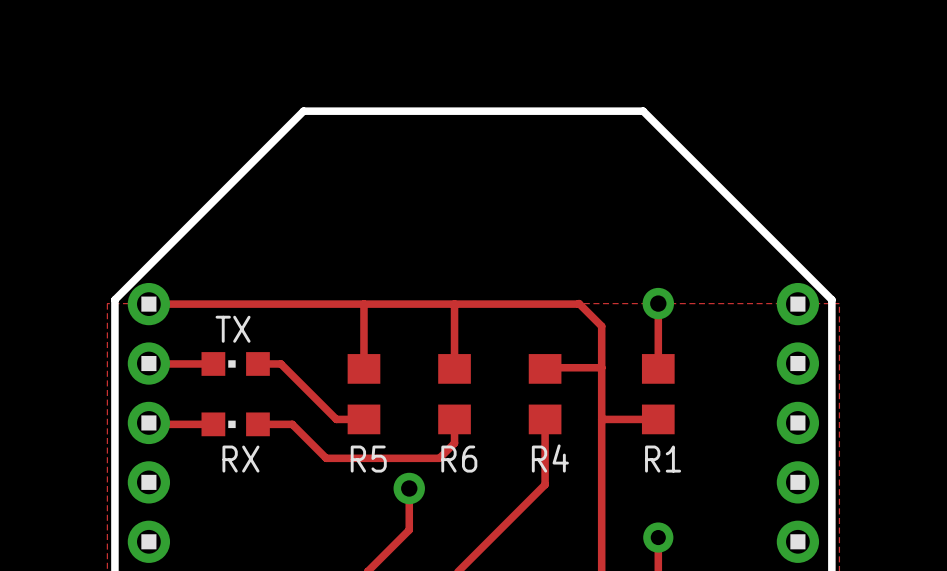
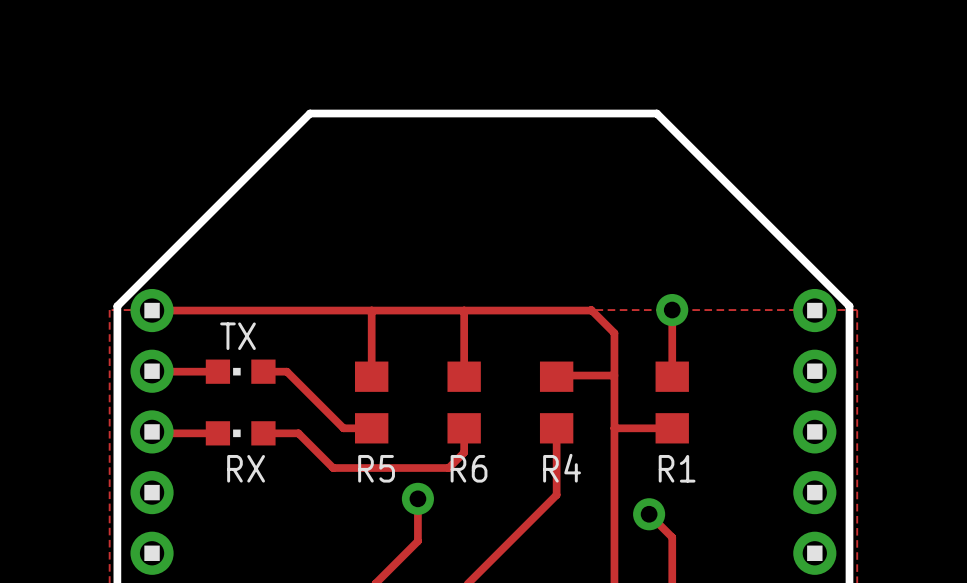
track: none -> (649, 514) (672, 537) (672, 548)
via: none -> (649, 514)
via: (658, 537) -> none

